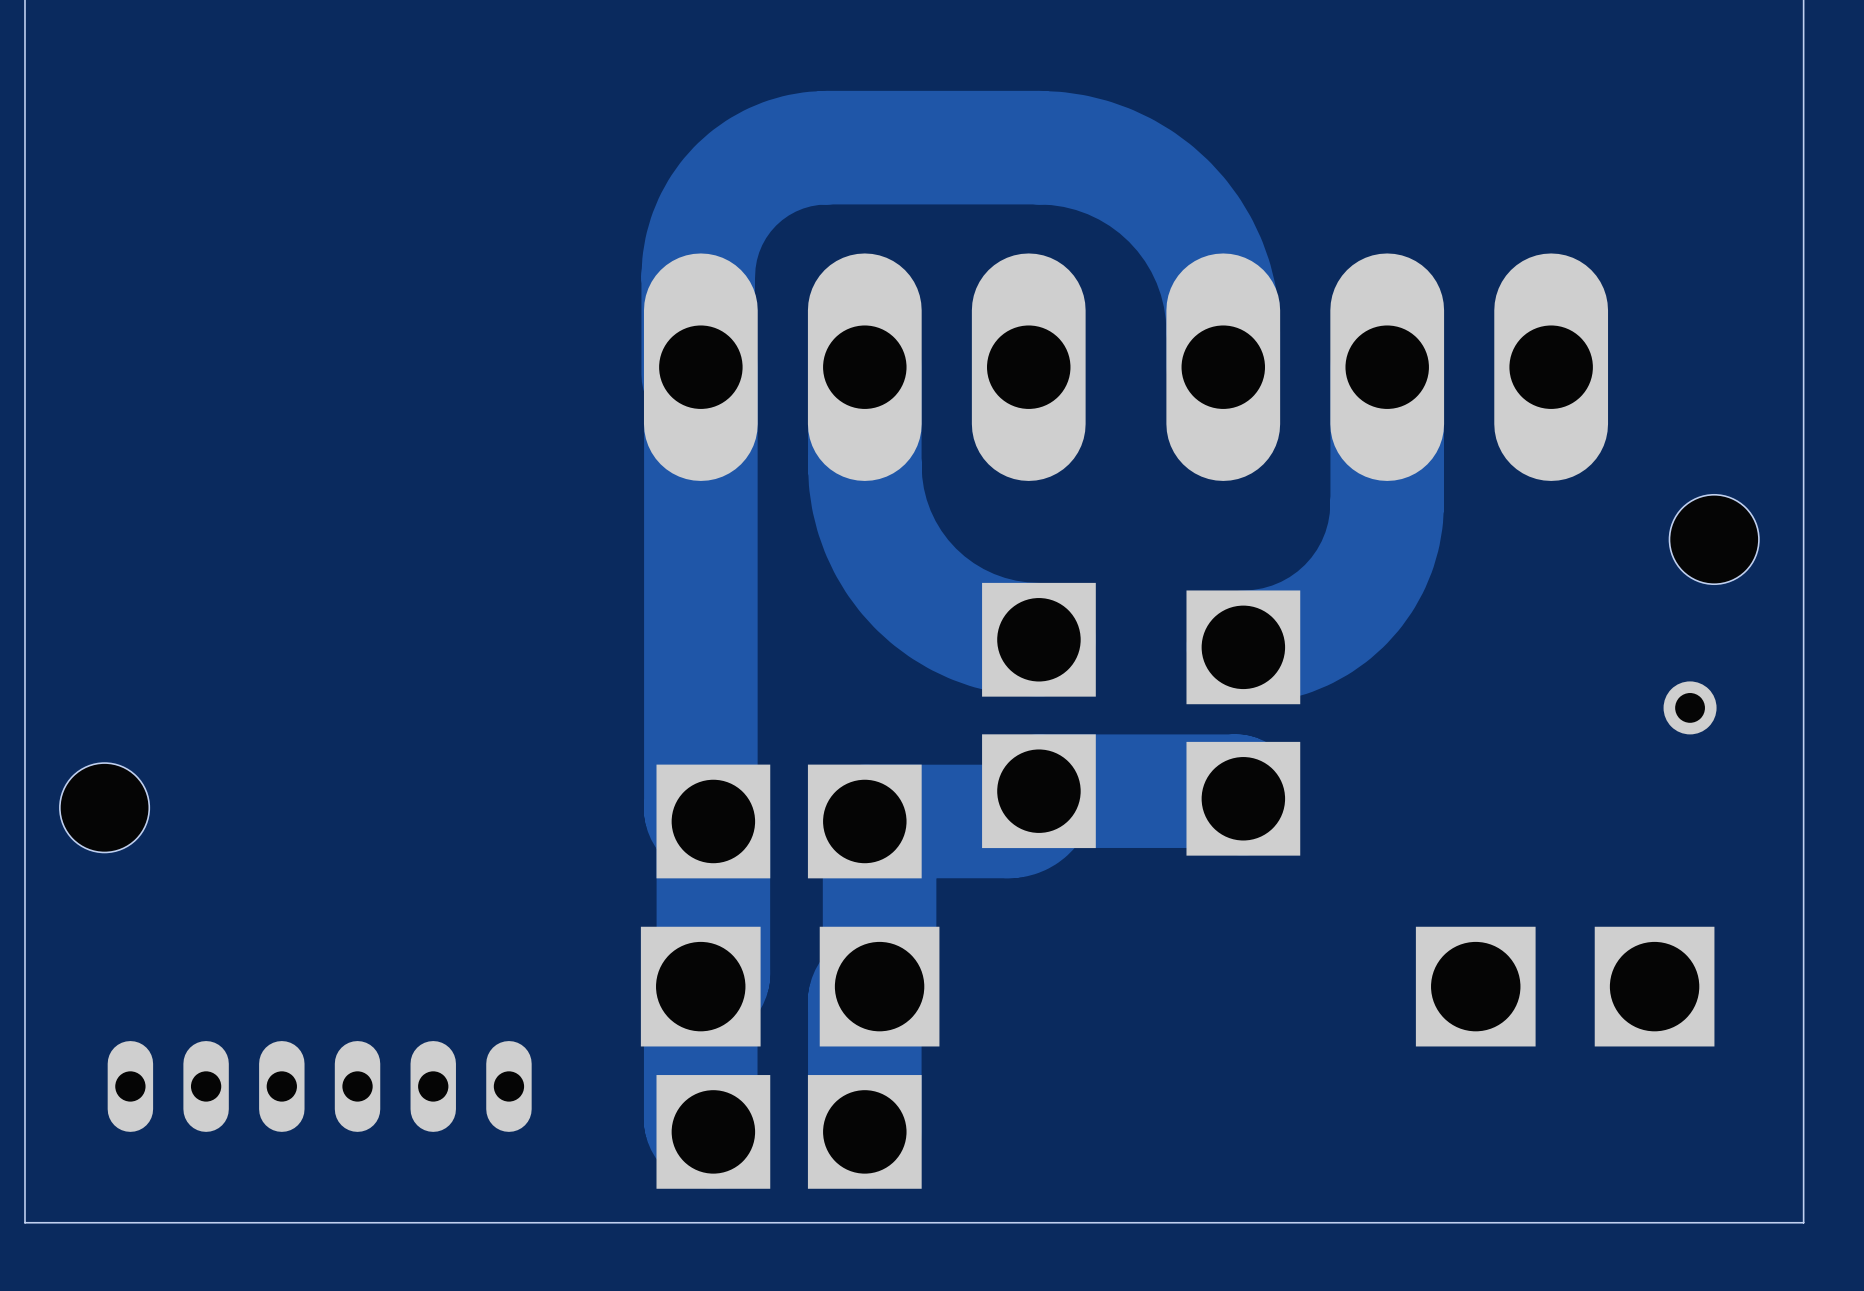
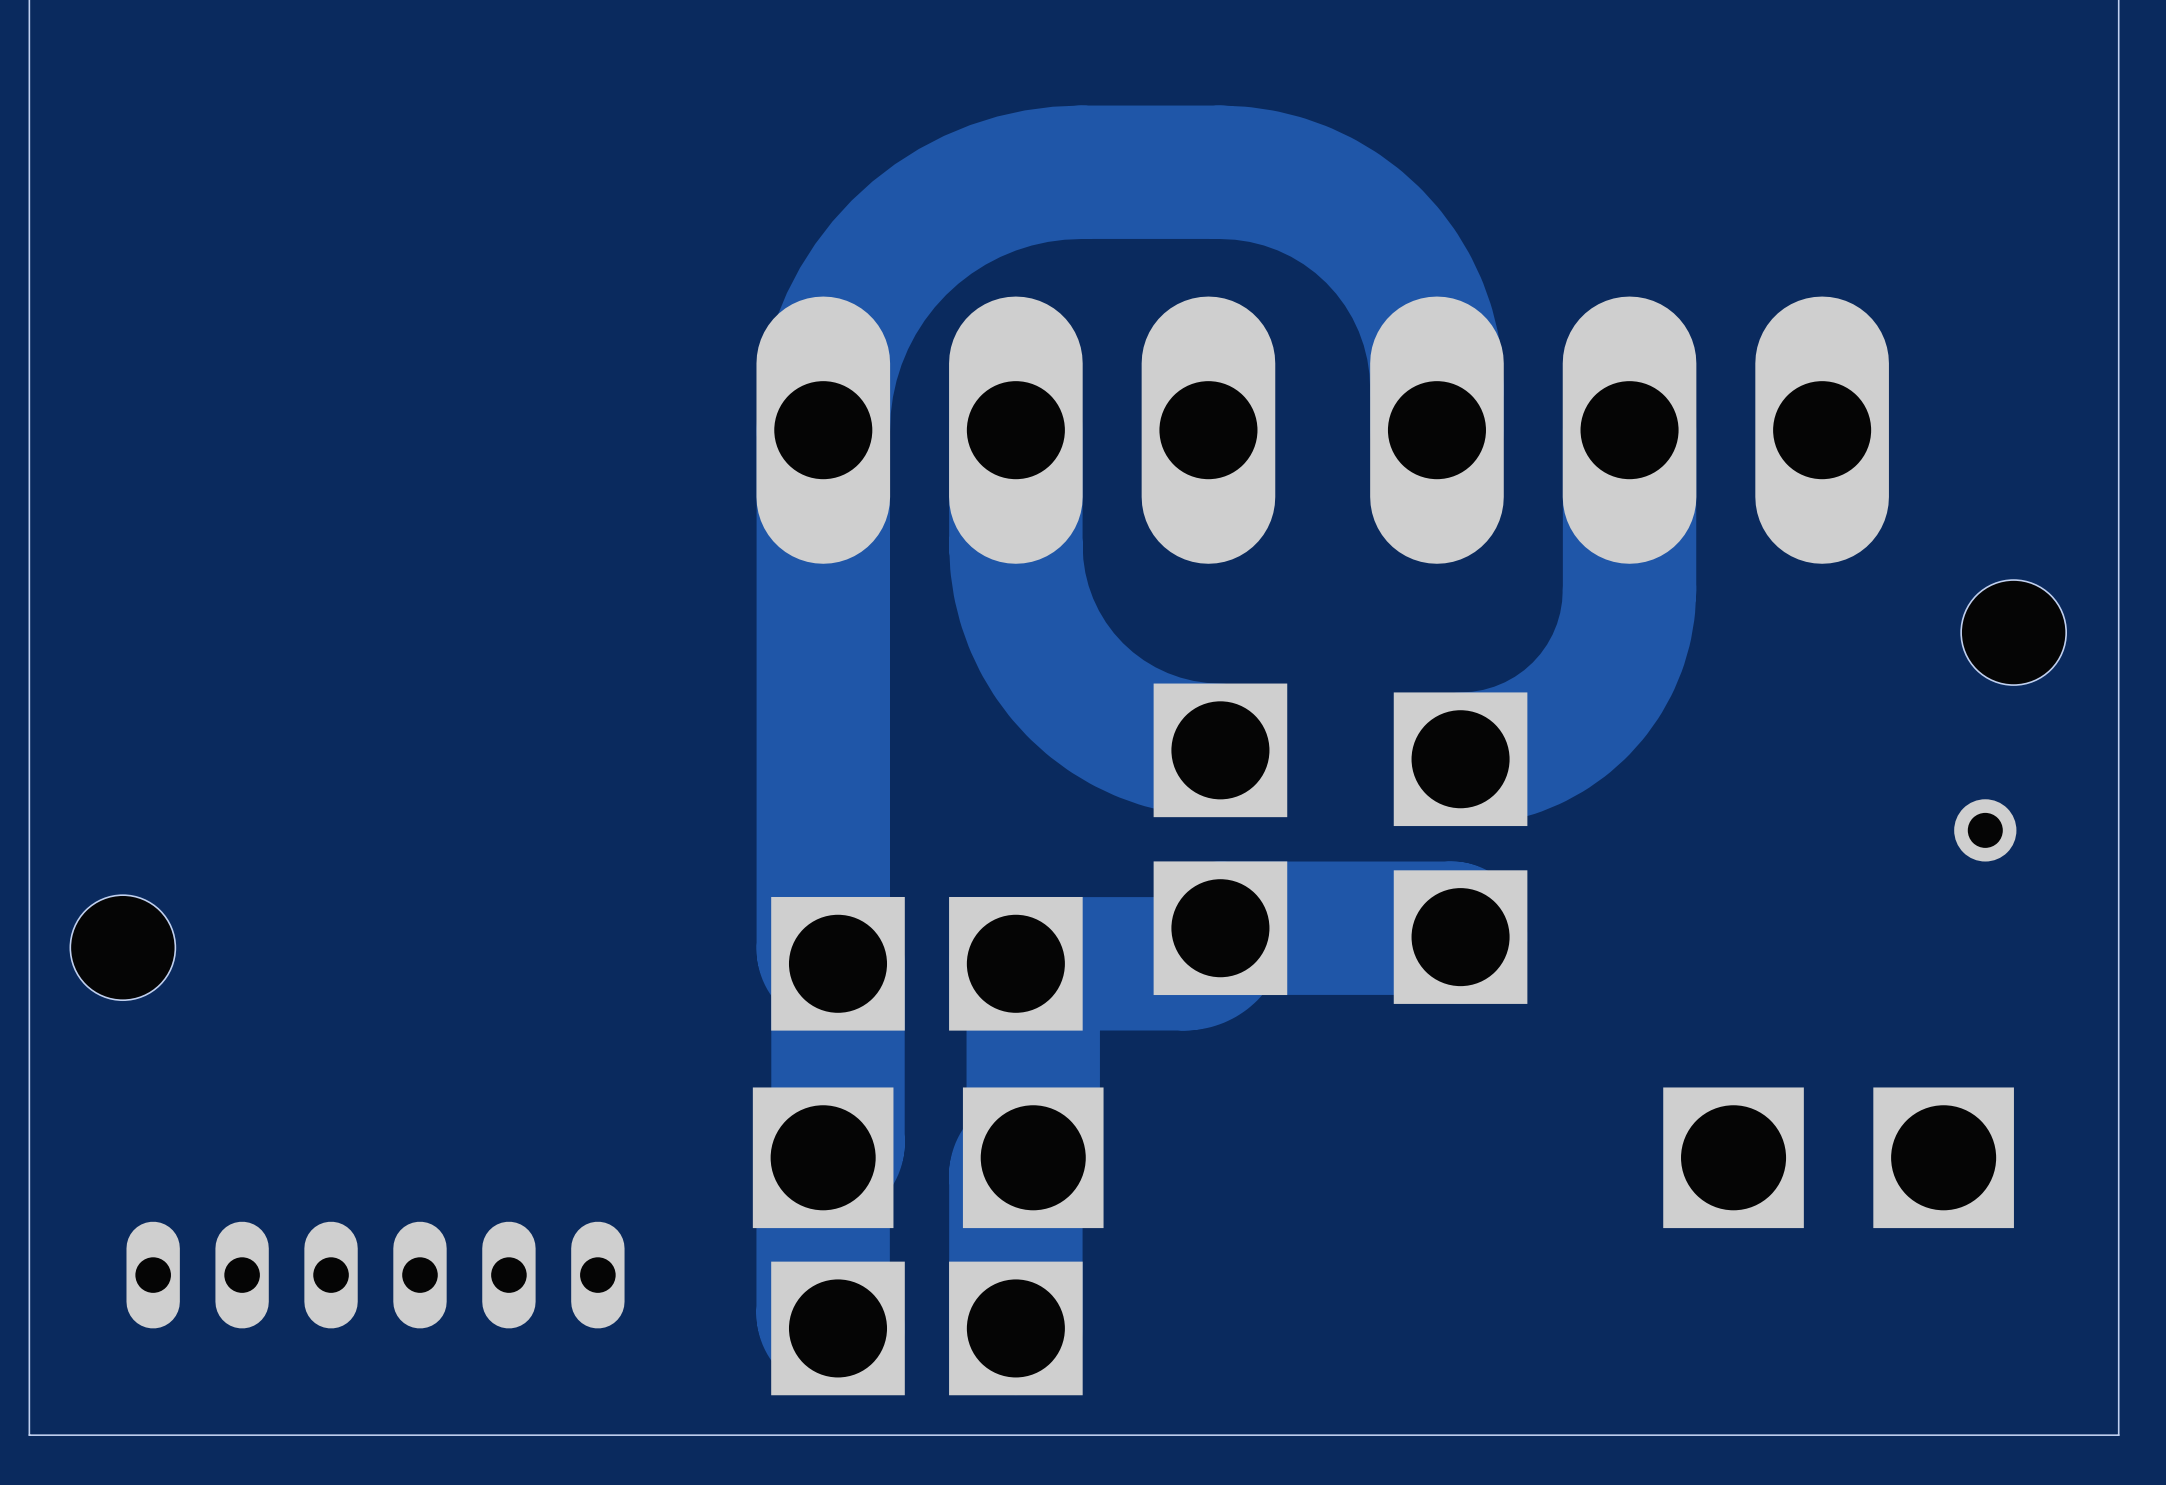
track: (920, 147) (826, 147) (798, 150) (784, 154) (758, 167) (735, 185) (726, 196) (710, 220) (701, 247) (698, 276) (698, 374) -> (1081, 172) (1036, 176) (992, 187) (952, 206) (933, 218) (898, 247) (883, 264) (857, 301) (838, 341) (827, 385) (823, 430)

